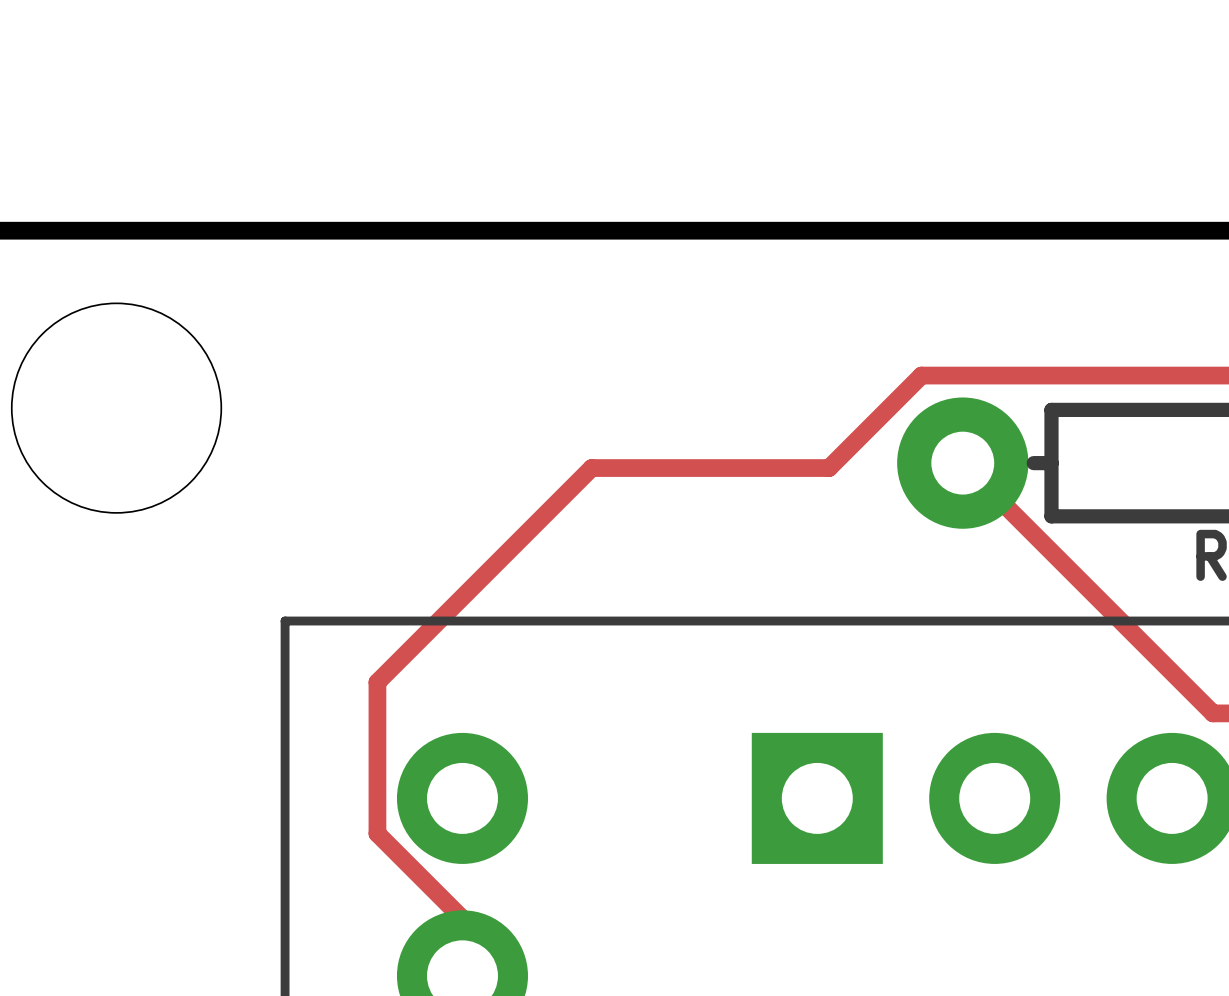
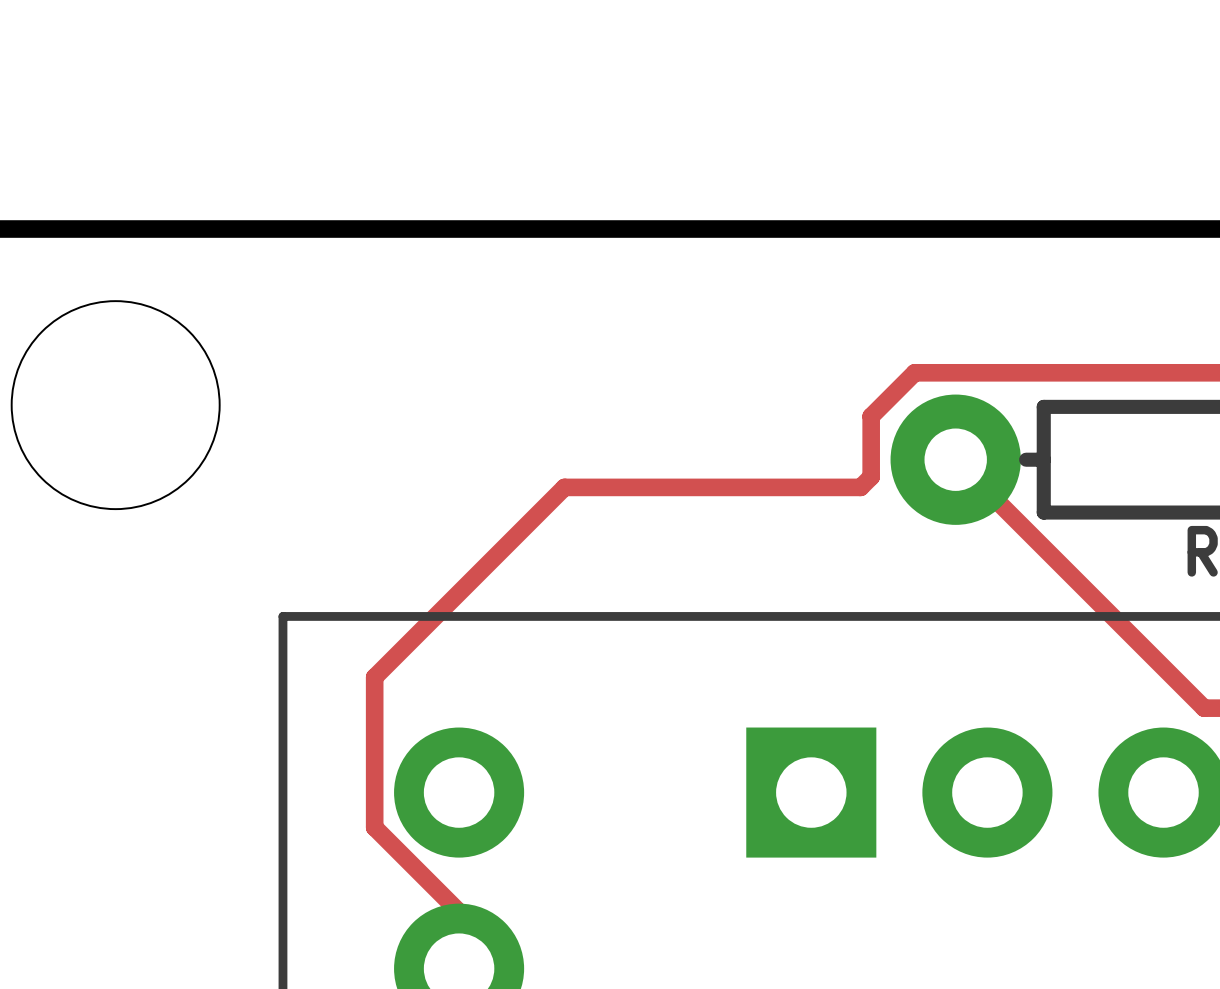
top track: (877, 419) (829, 468) (591, 468) (568, 491) -> (871, 416) (871, 476) (860, 487) (564, 487)

